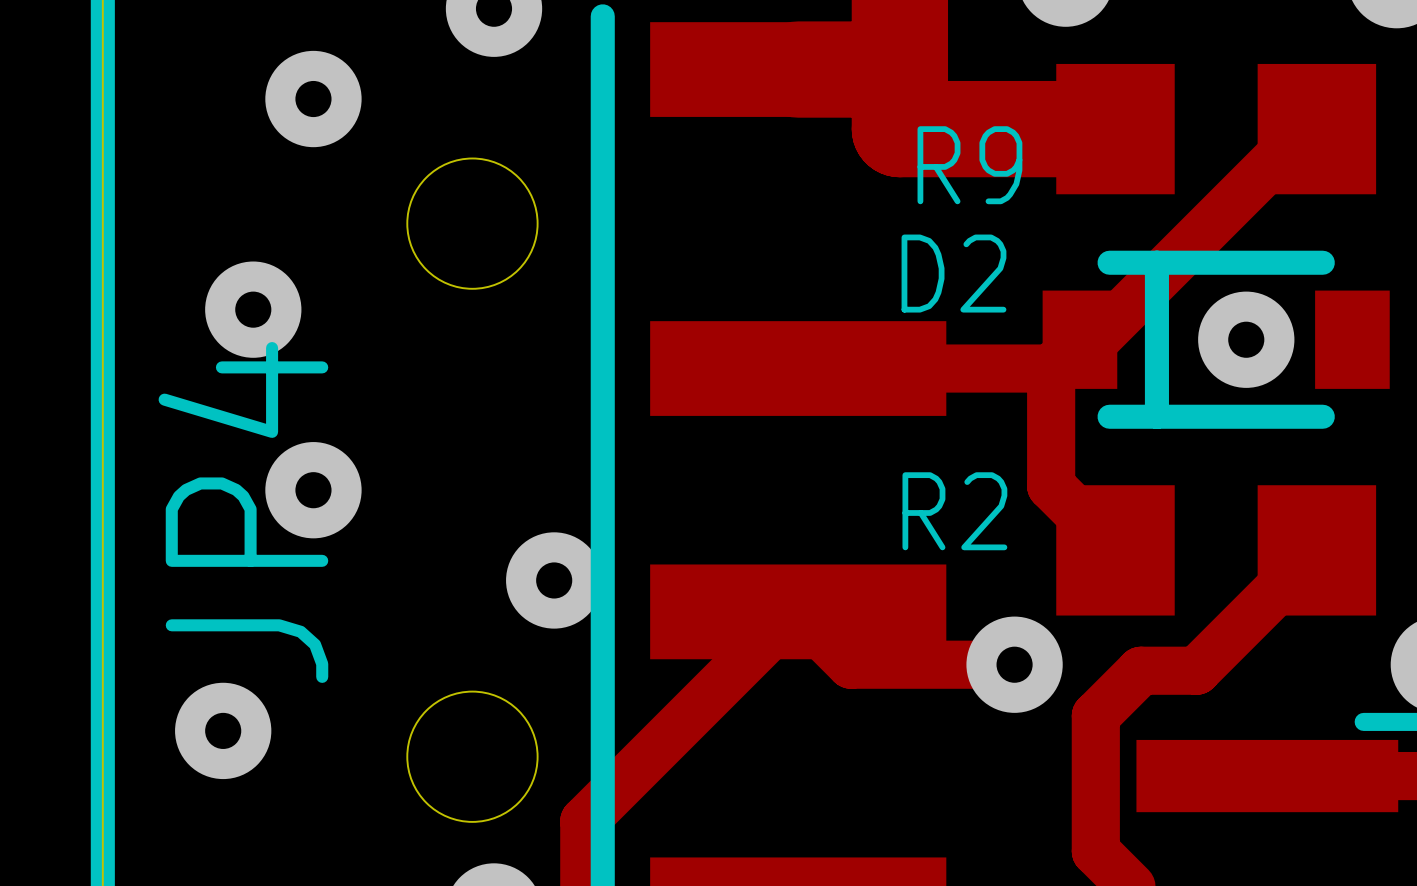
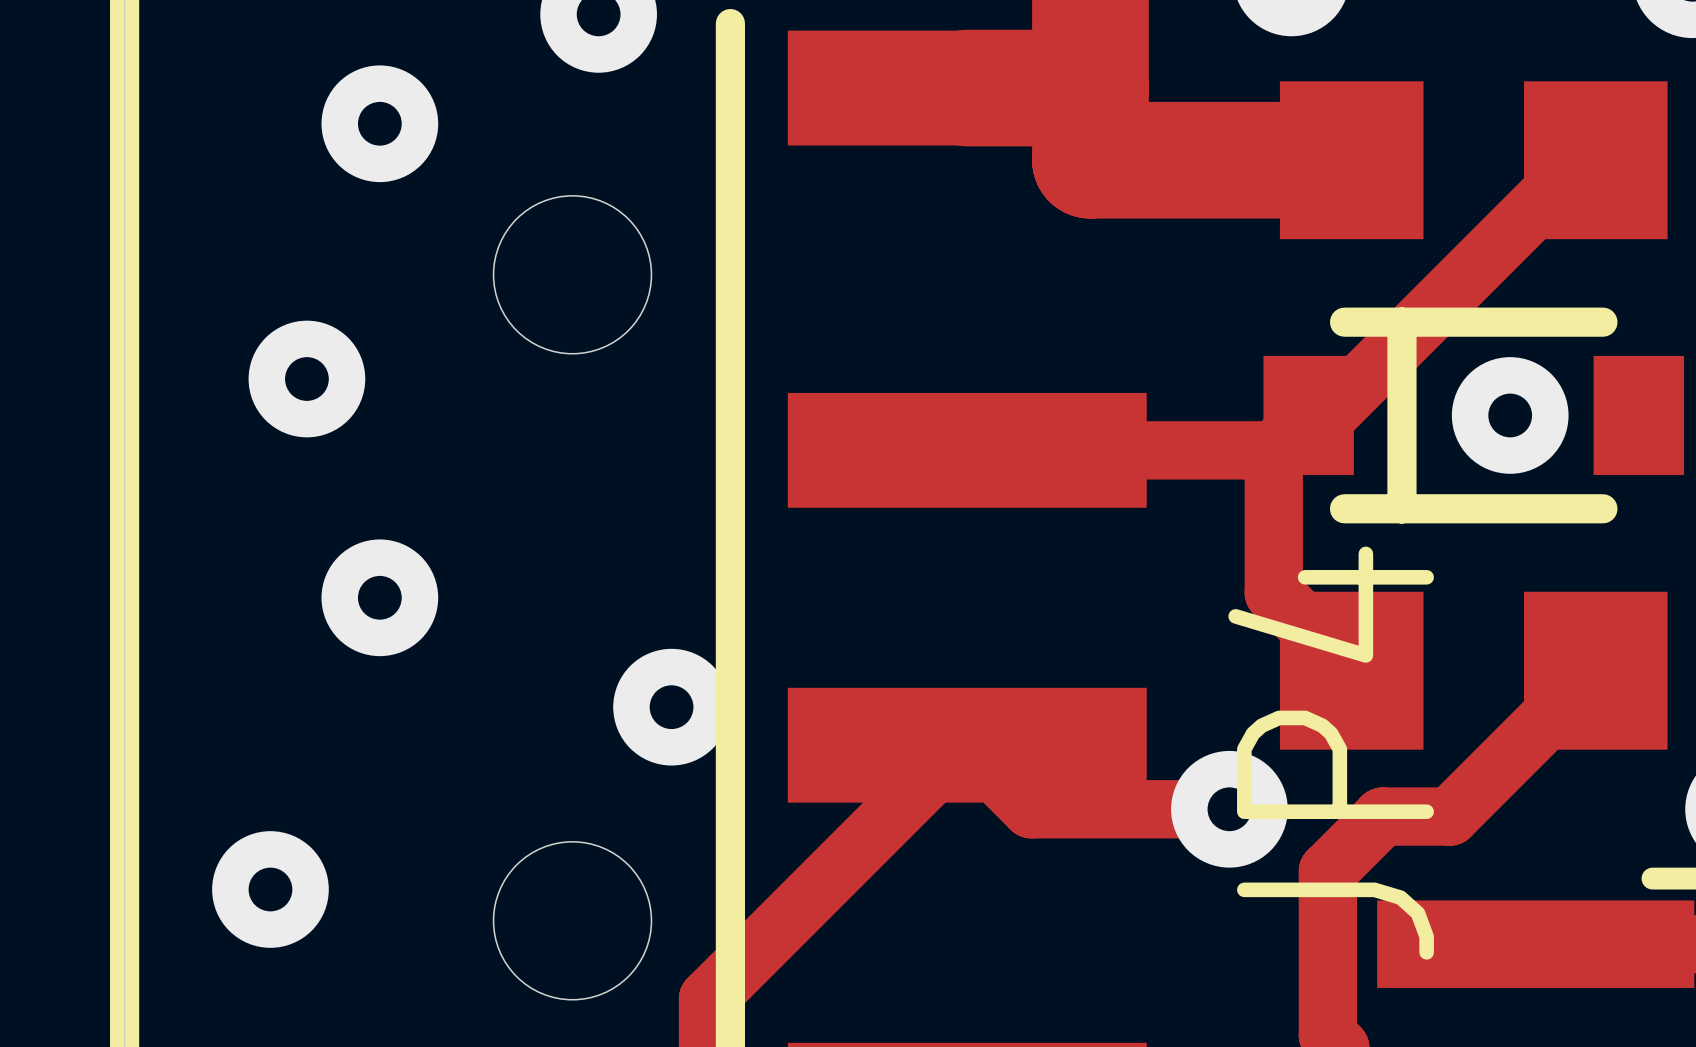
R9 name: R9 (969, 165) -> none
D2 name: D2 (953, 273) -> none
R2 name: R2 (954, 511) -> none
JP4 name position: JP4 (243, 512) -> JP4 (1331, 753)

